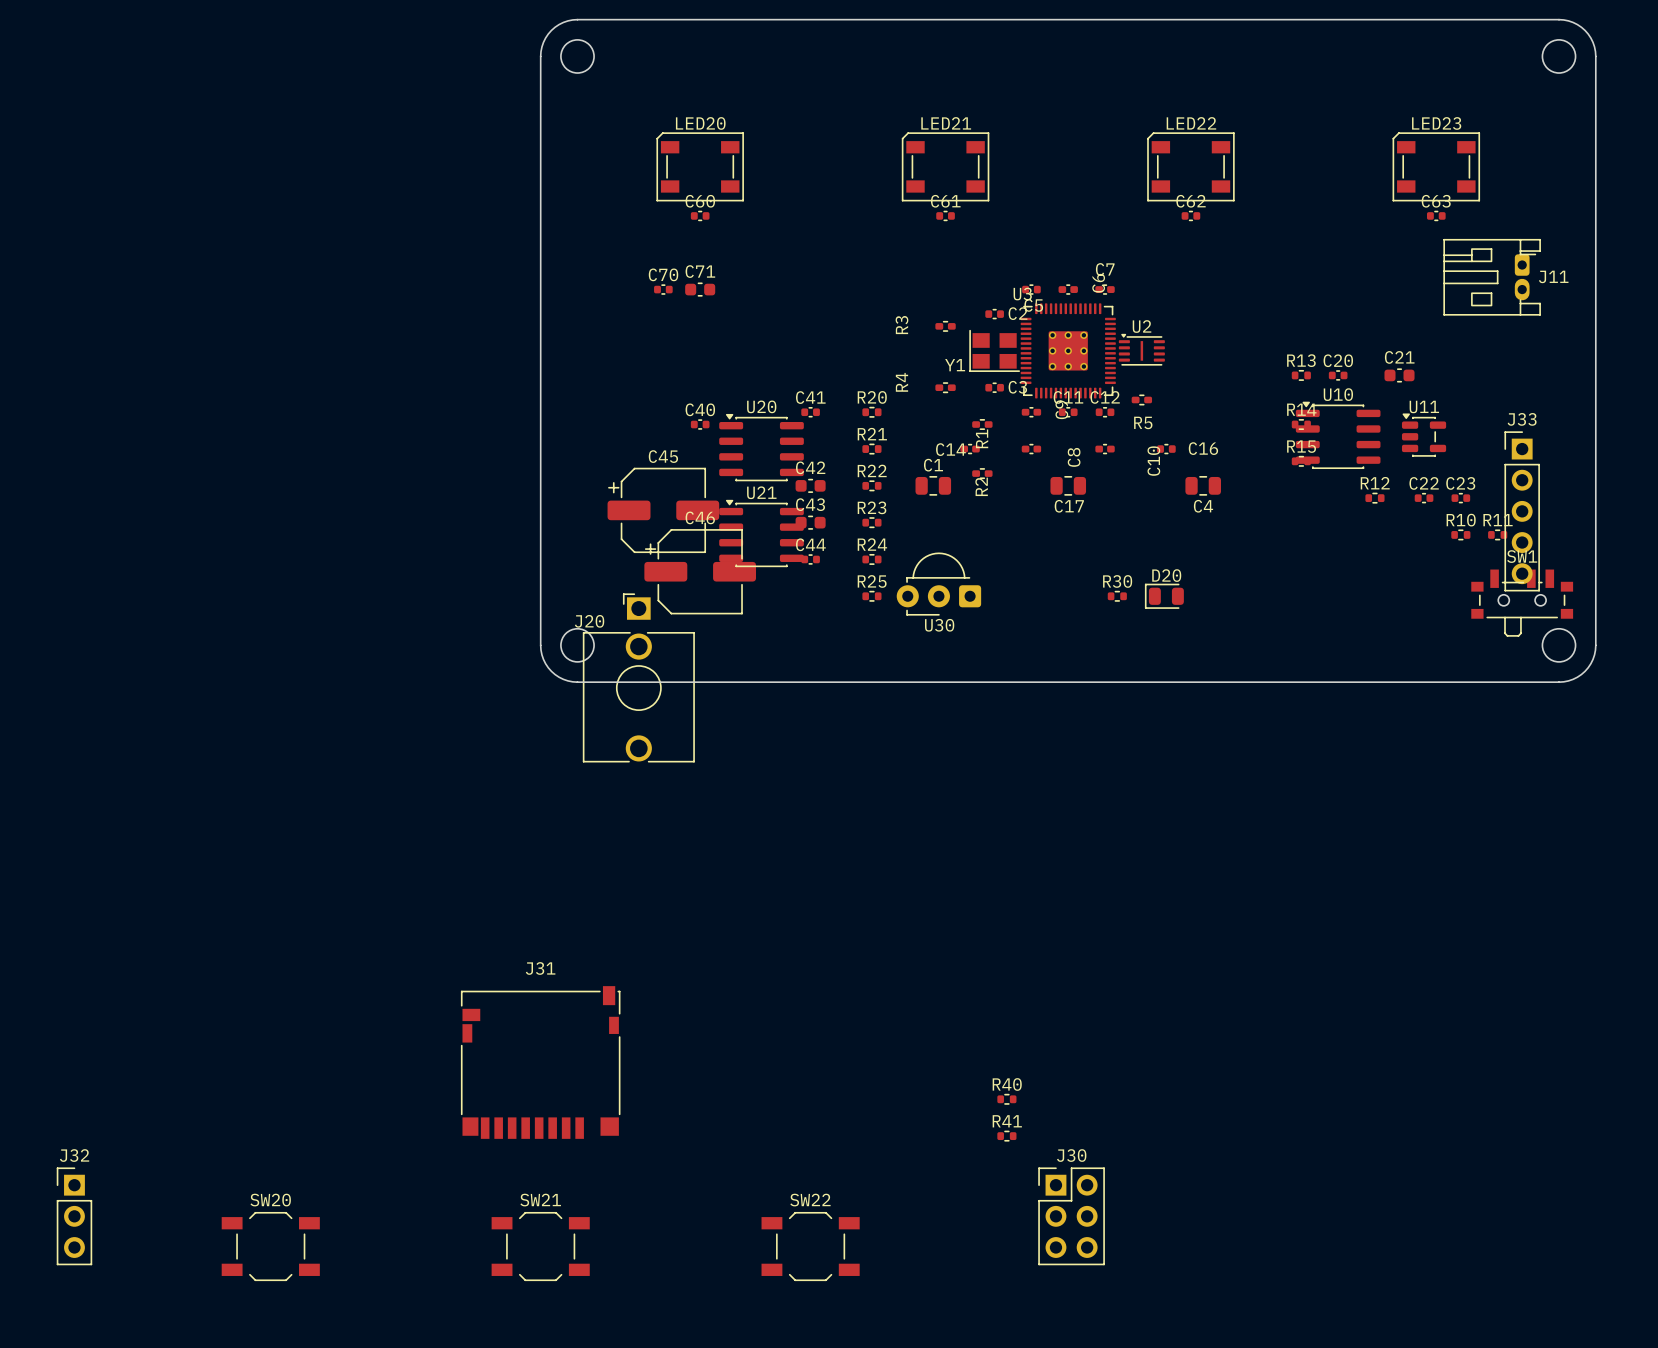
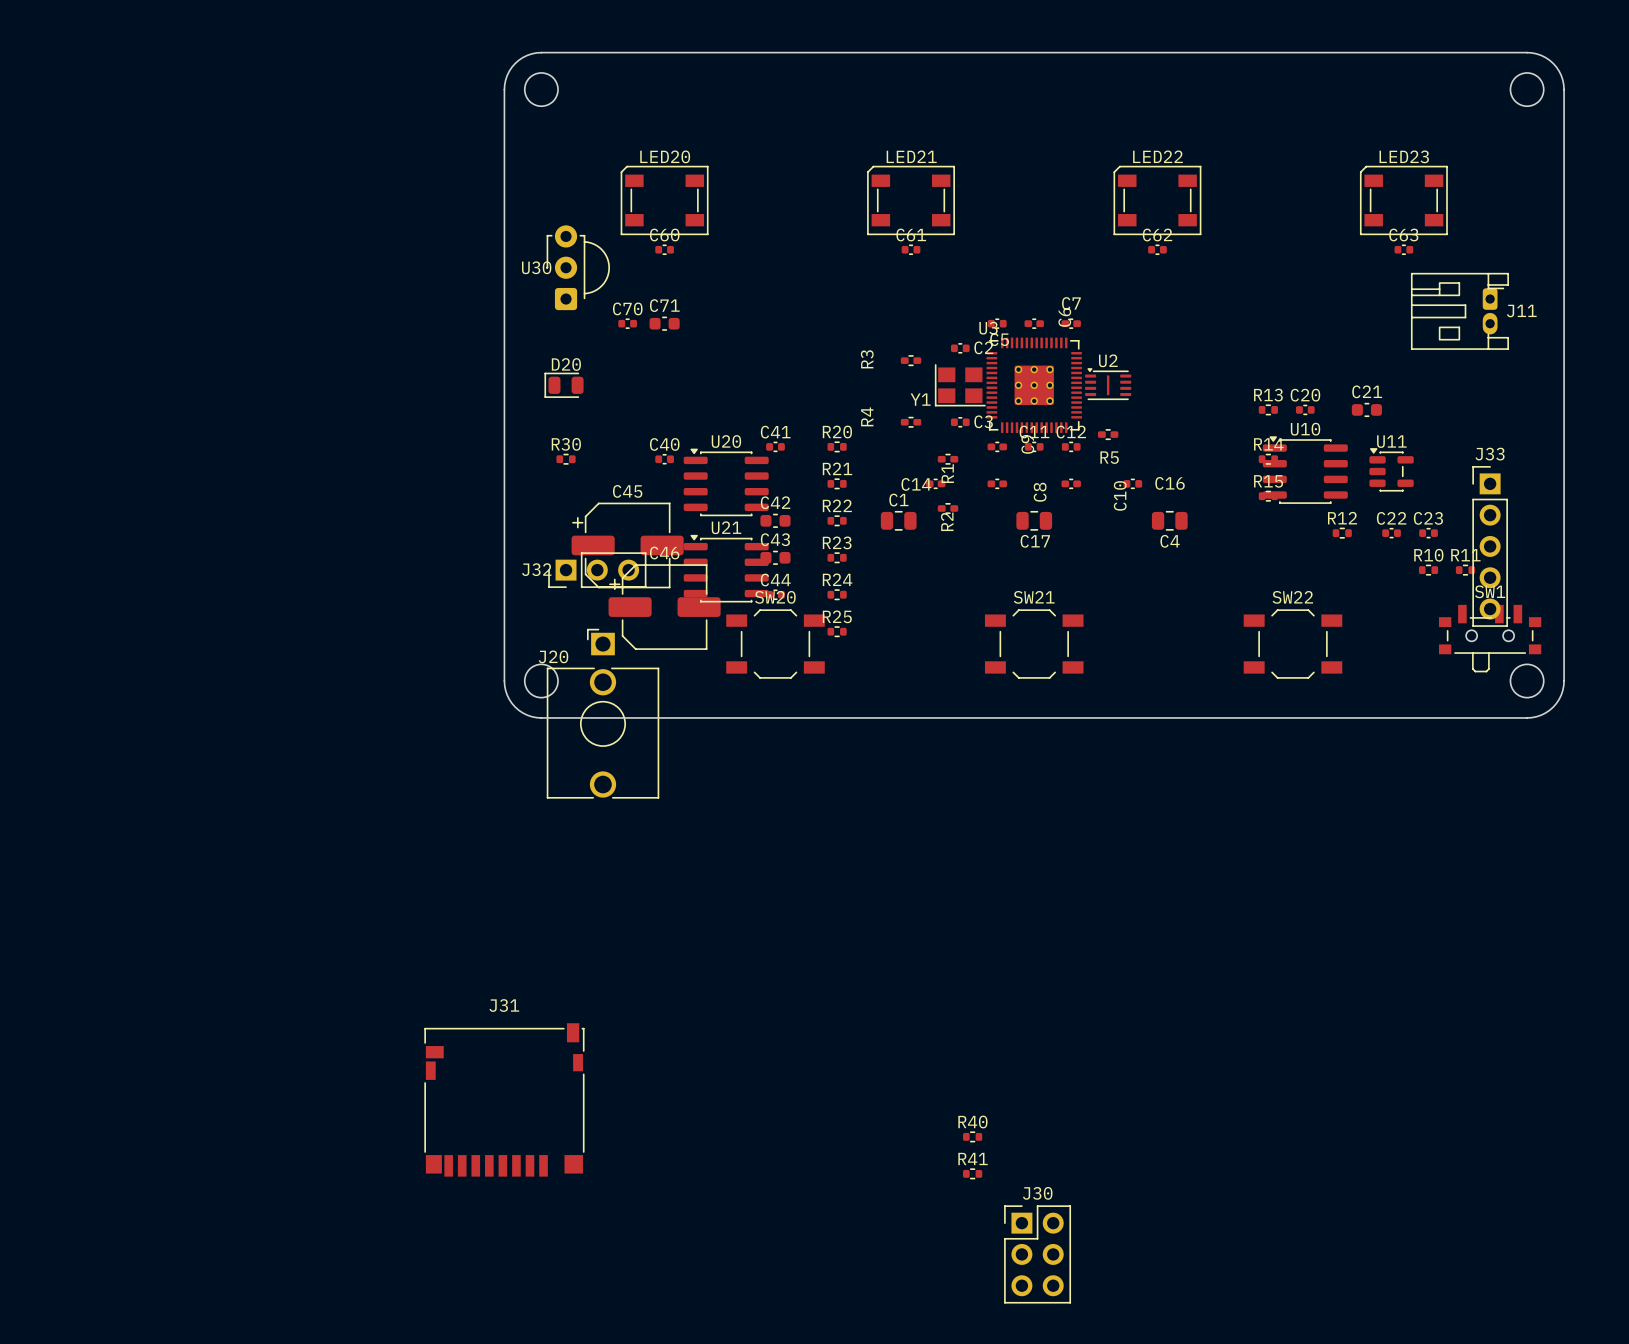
U30 rotation: 0° (938, 584) -> 90° clockwise (578, 267)
U30 position: (938, 584) -> (578, 267)
R30 position: (1117, 596) -> (566, 459)
D20 position: (1164, 596) -> (564, 385)
J32 rotation: 0° (74, 1216) -> 90° counterclockwise (597, 570)
J32 position: (74, 1216) -> (597, 570)
SW20 position: (270, 1246) -> (775, 644)
SW21 position: (540, 1246) -> (1034, 644)
SW22 position: (810, 1246) -> (1292, 644)

